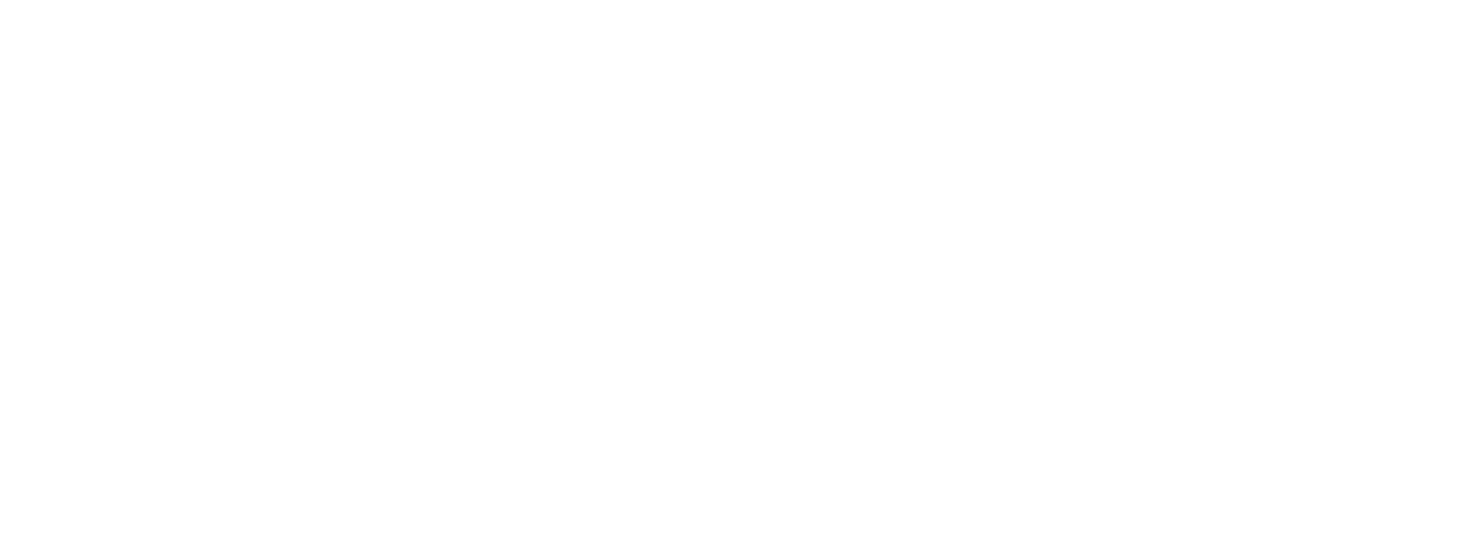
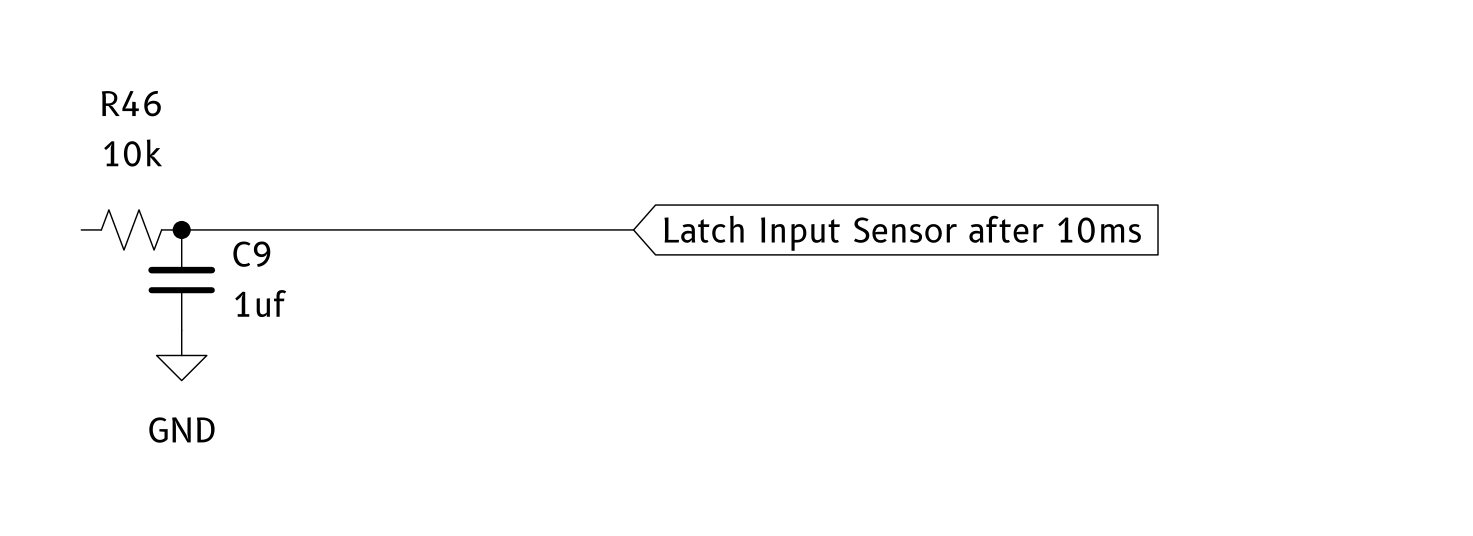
R46: none -> 10k (131, 229)
wire: none -> (181, 229) (633, 229)
junction: none -> (181, 229)
global label: none -> Latch Input Sensor after 10ms (902, 233)
C9: none -> 1uf (181, 280)
power symbol: none -> GND (181, 355)

